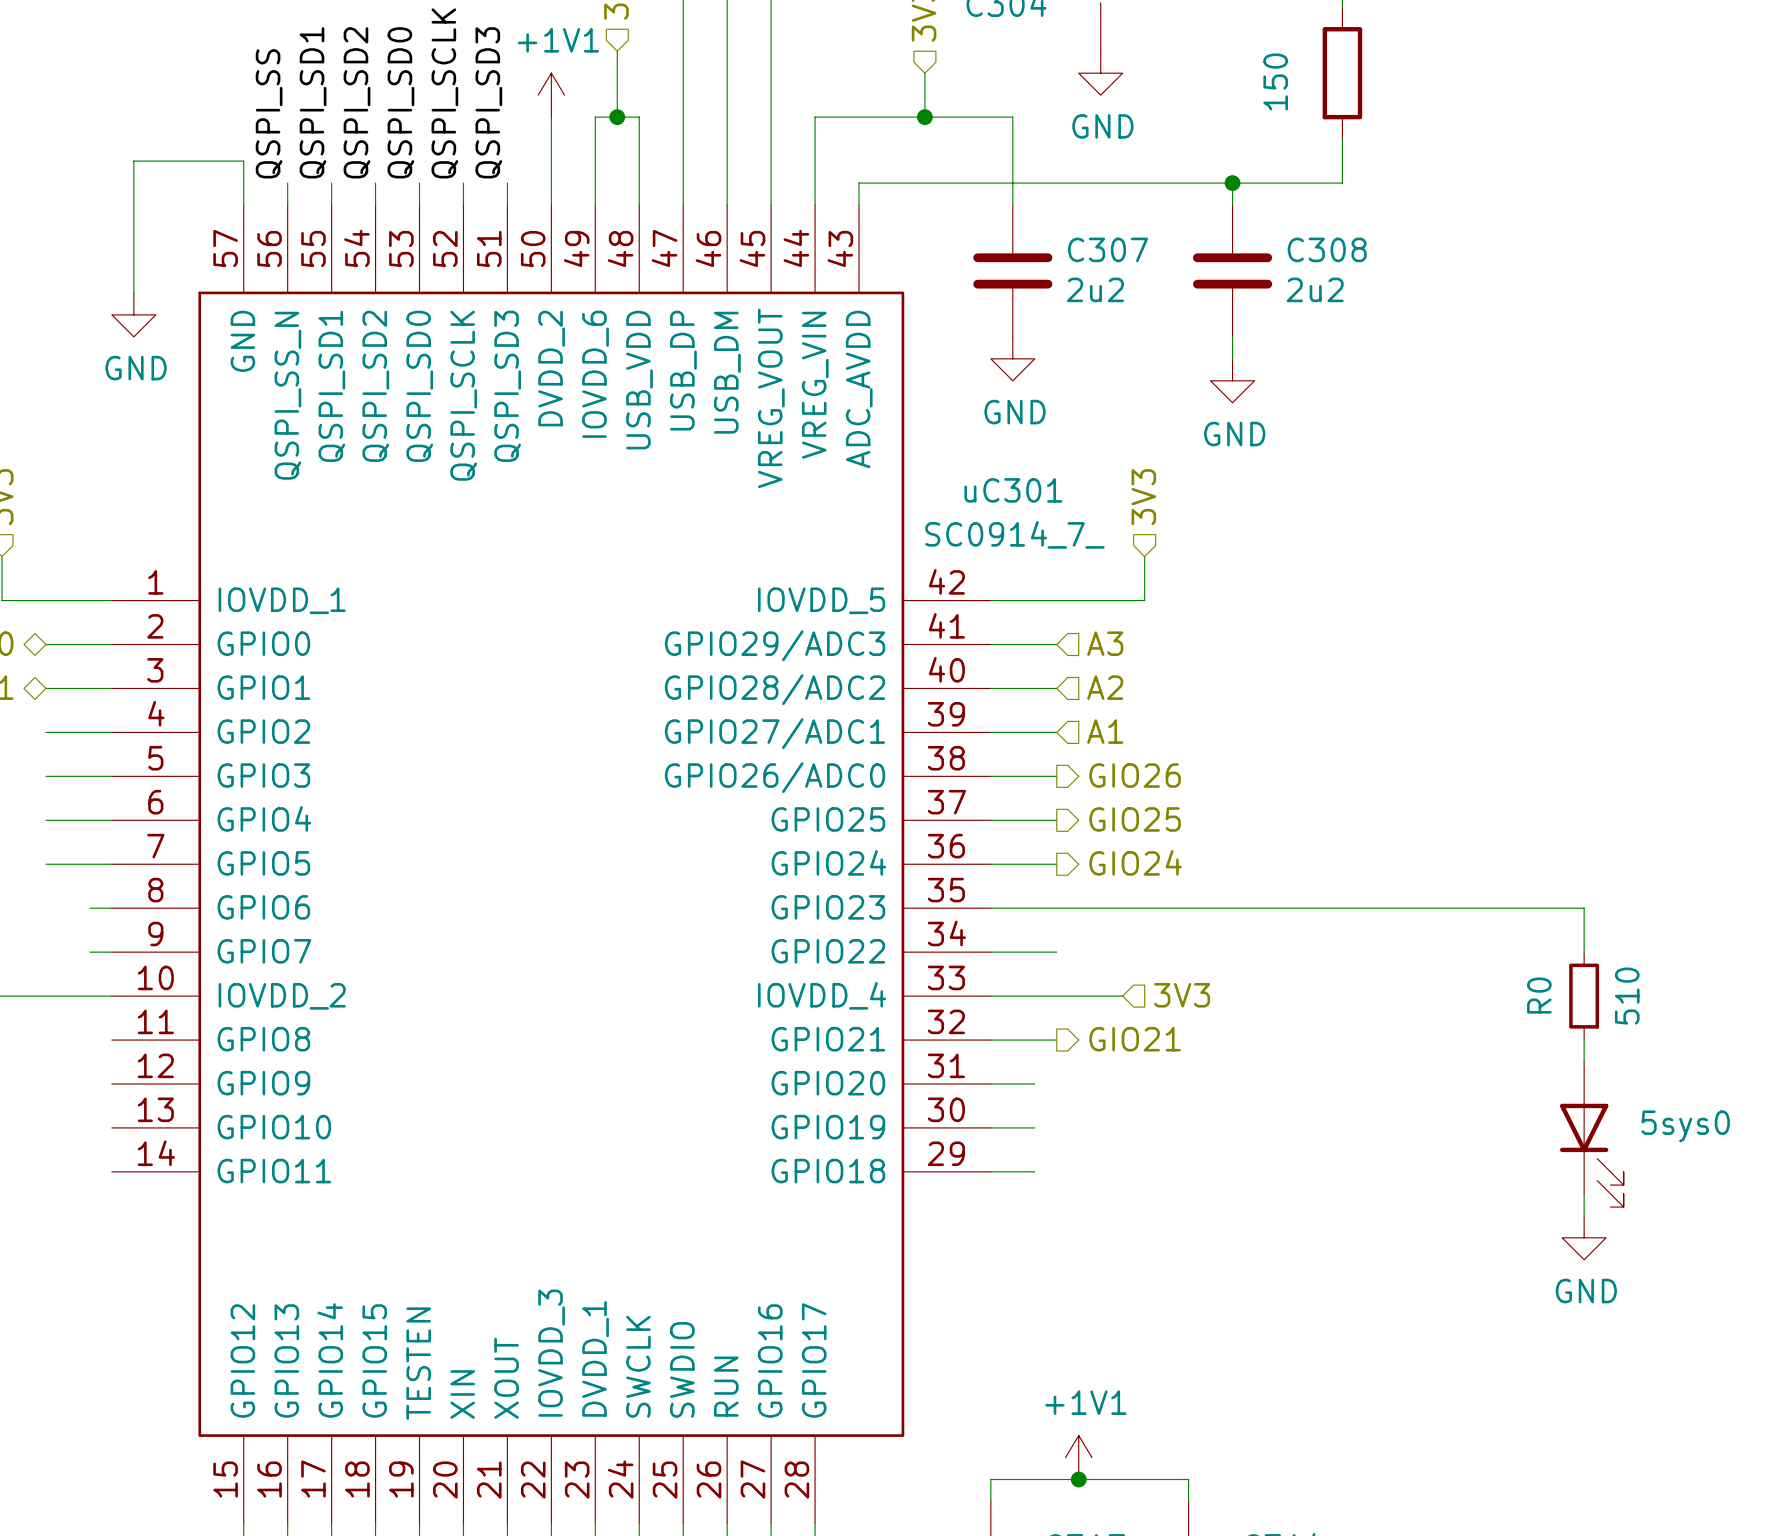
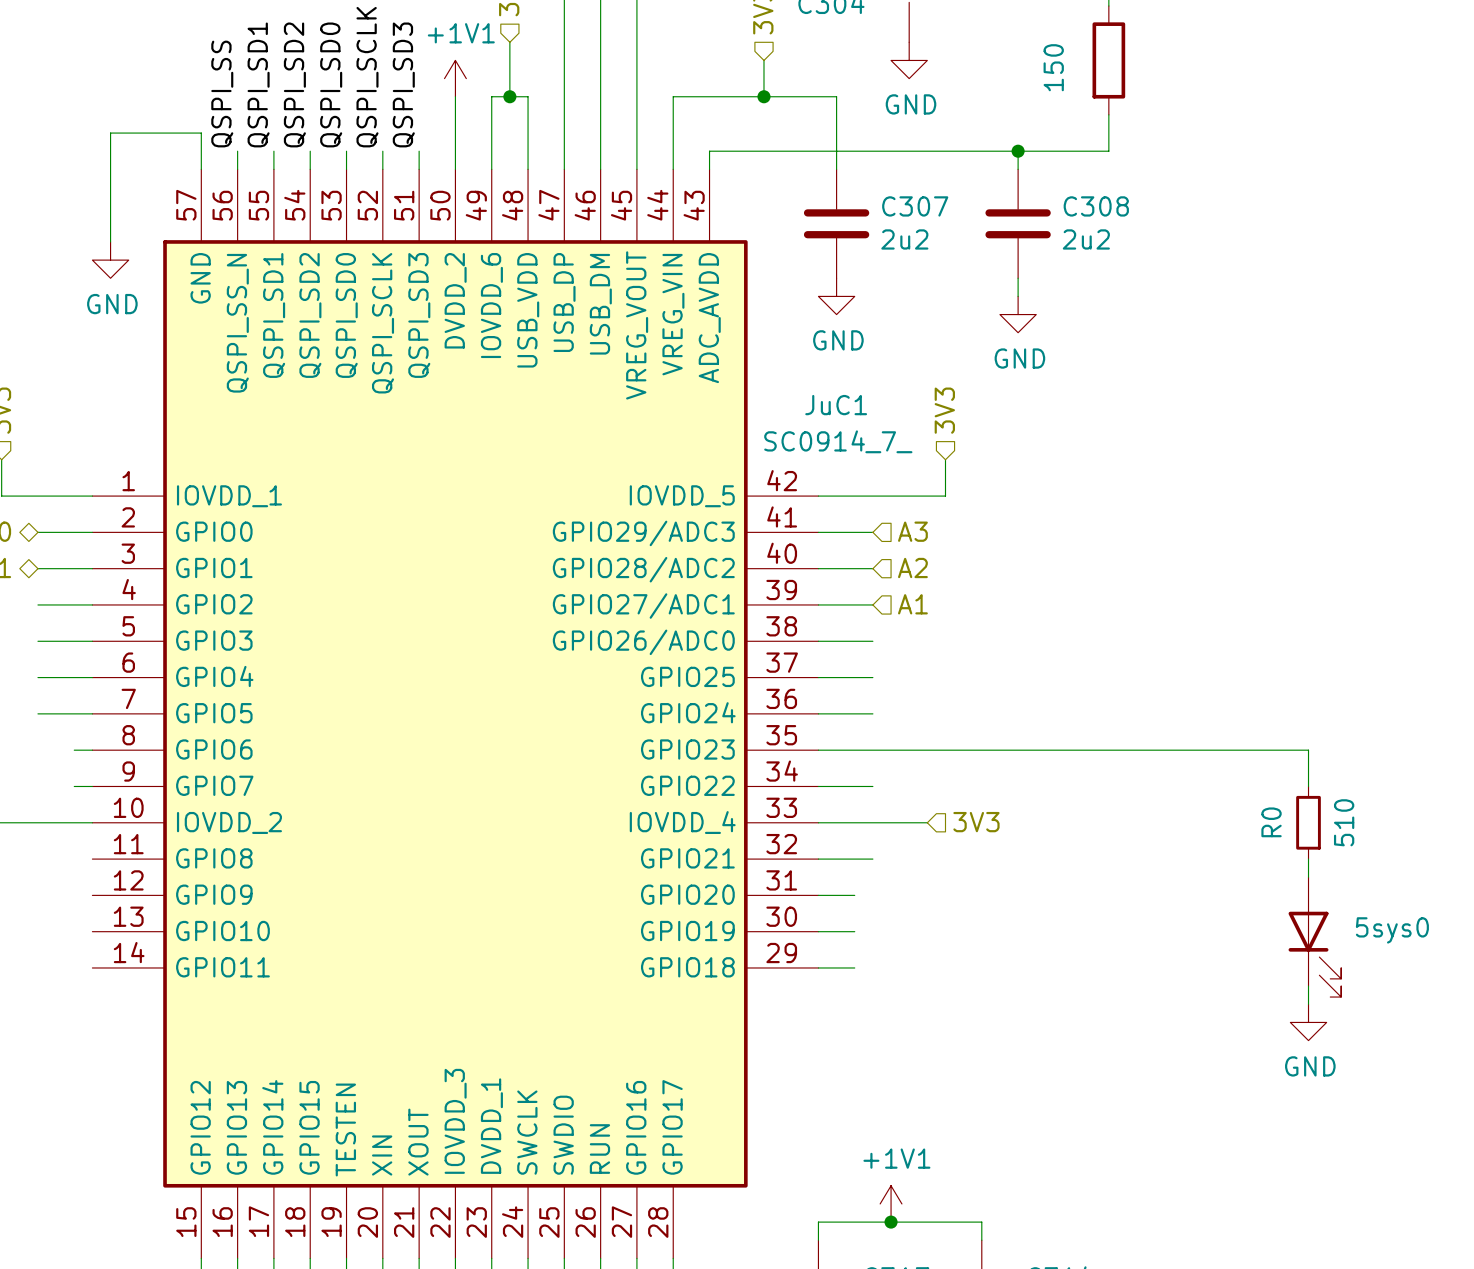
hierarchical label: GIO26 (1135, 775) -> none
hierarchical label: GIO25 (1135, 819) -> none
hierarchical label: GIO24 (1135, 862) -> none
uC301: SC0914_7_ (551, 864) -> none
JuC1: none -> SC0914_7_ (455, 713)
hierarchical label: GIO21 (1135, 1039) -> none

